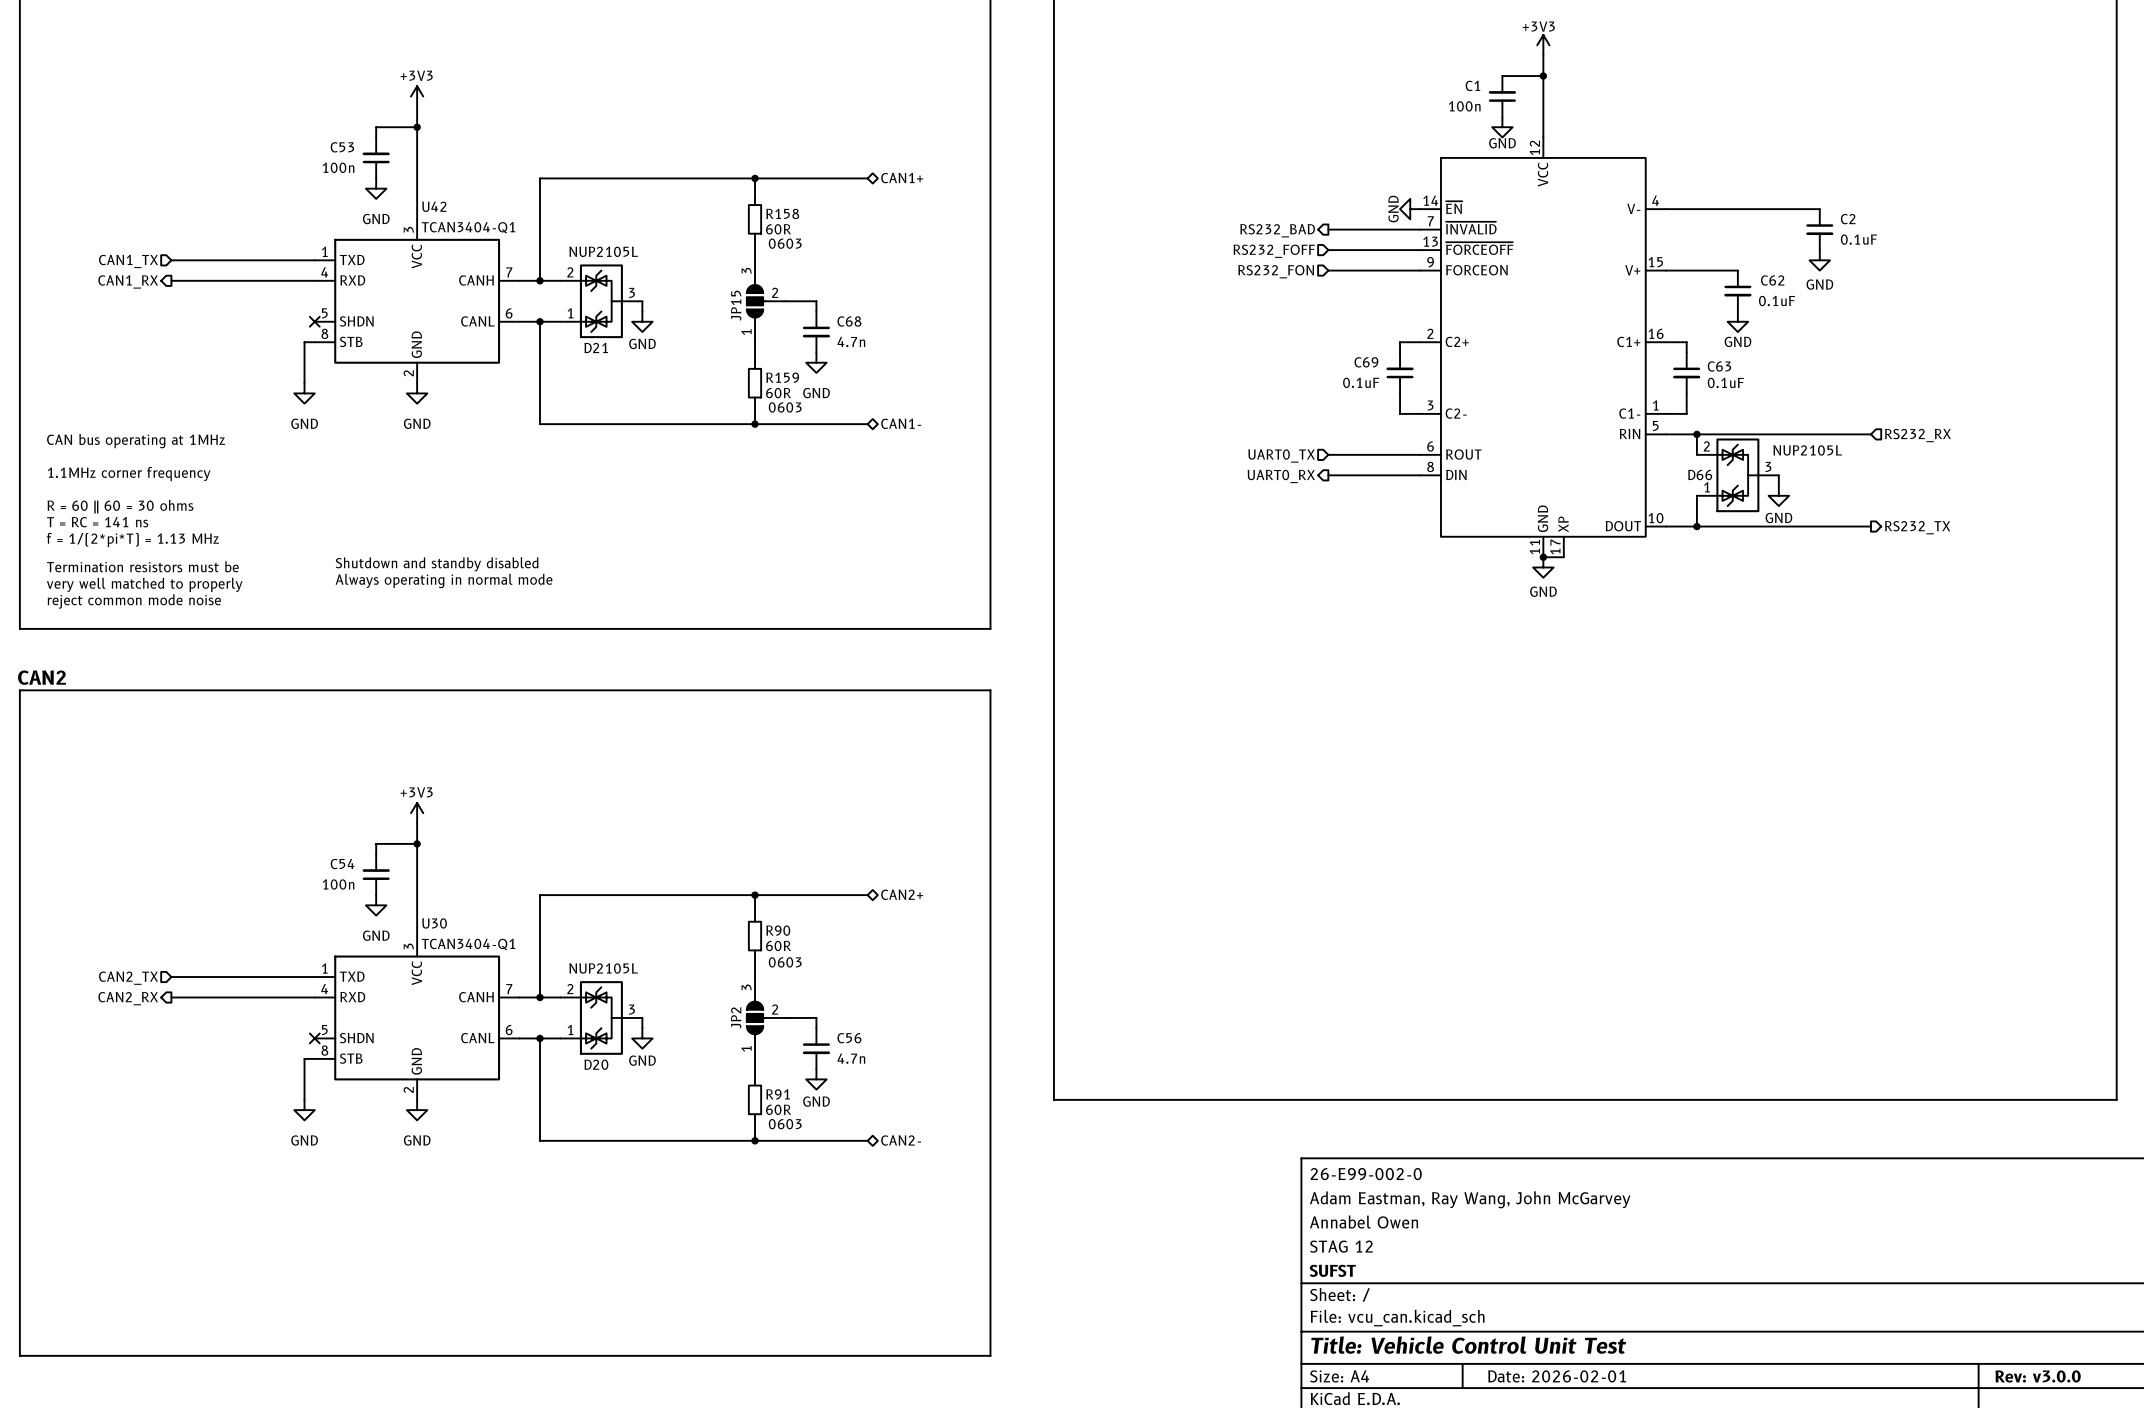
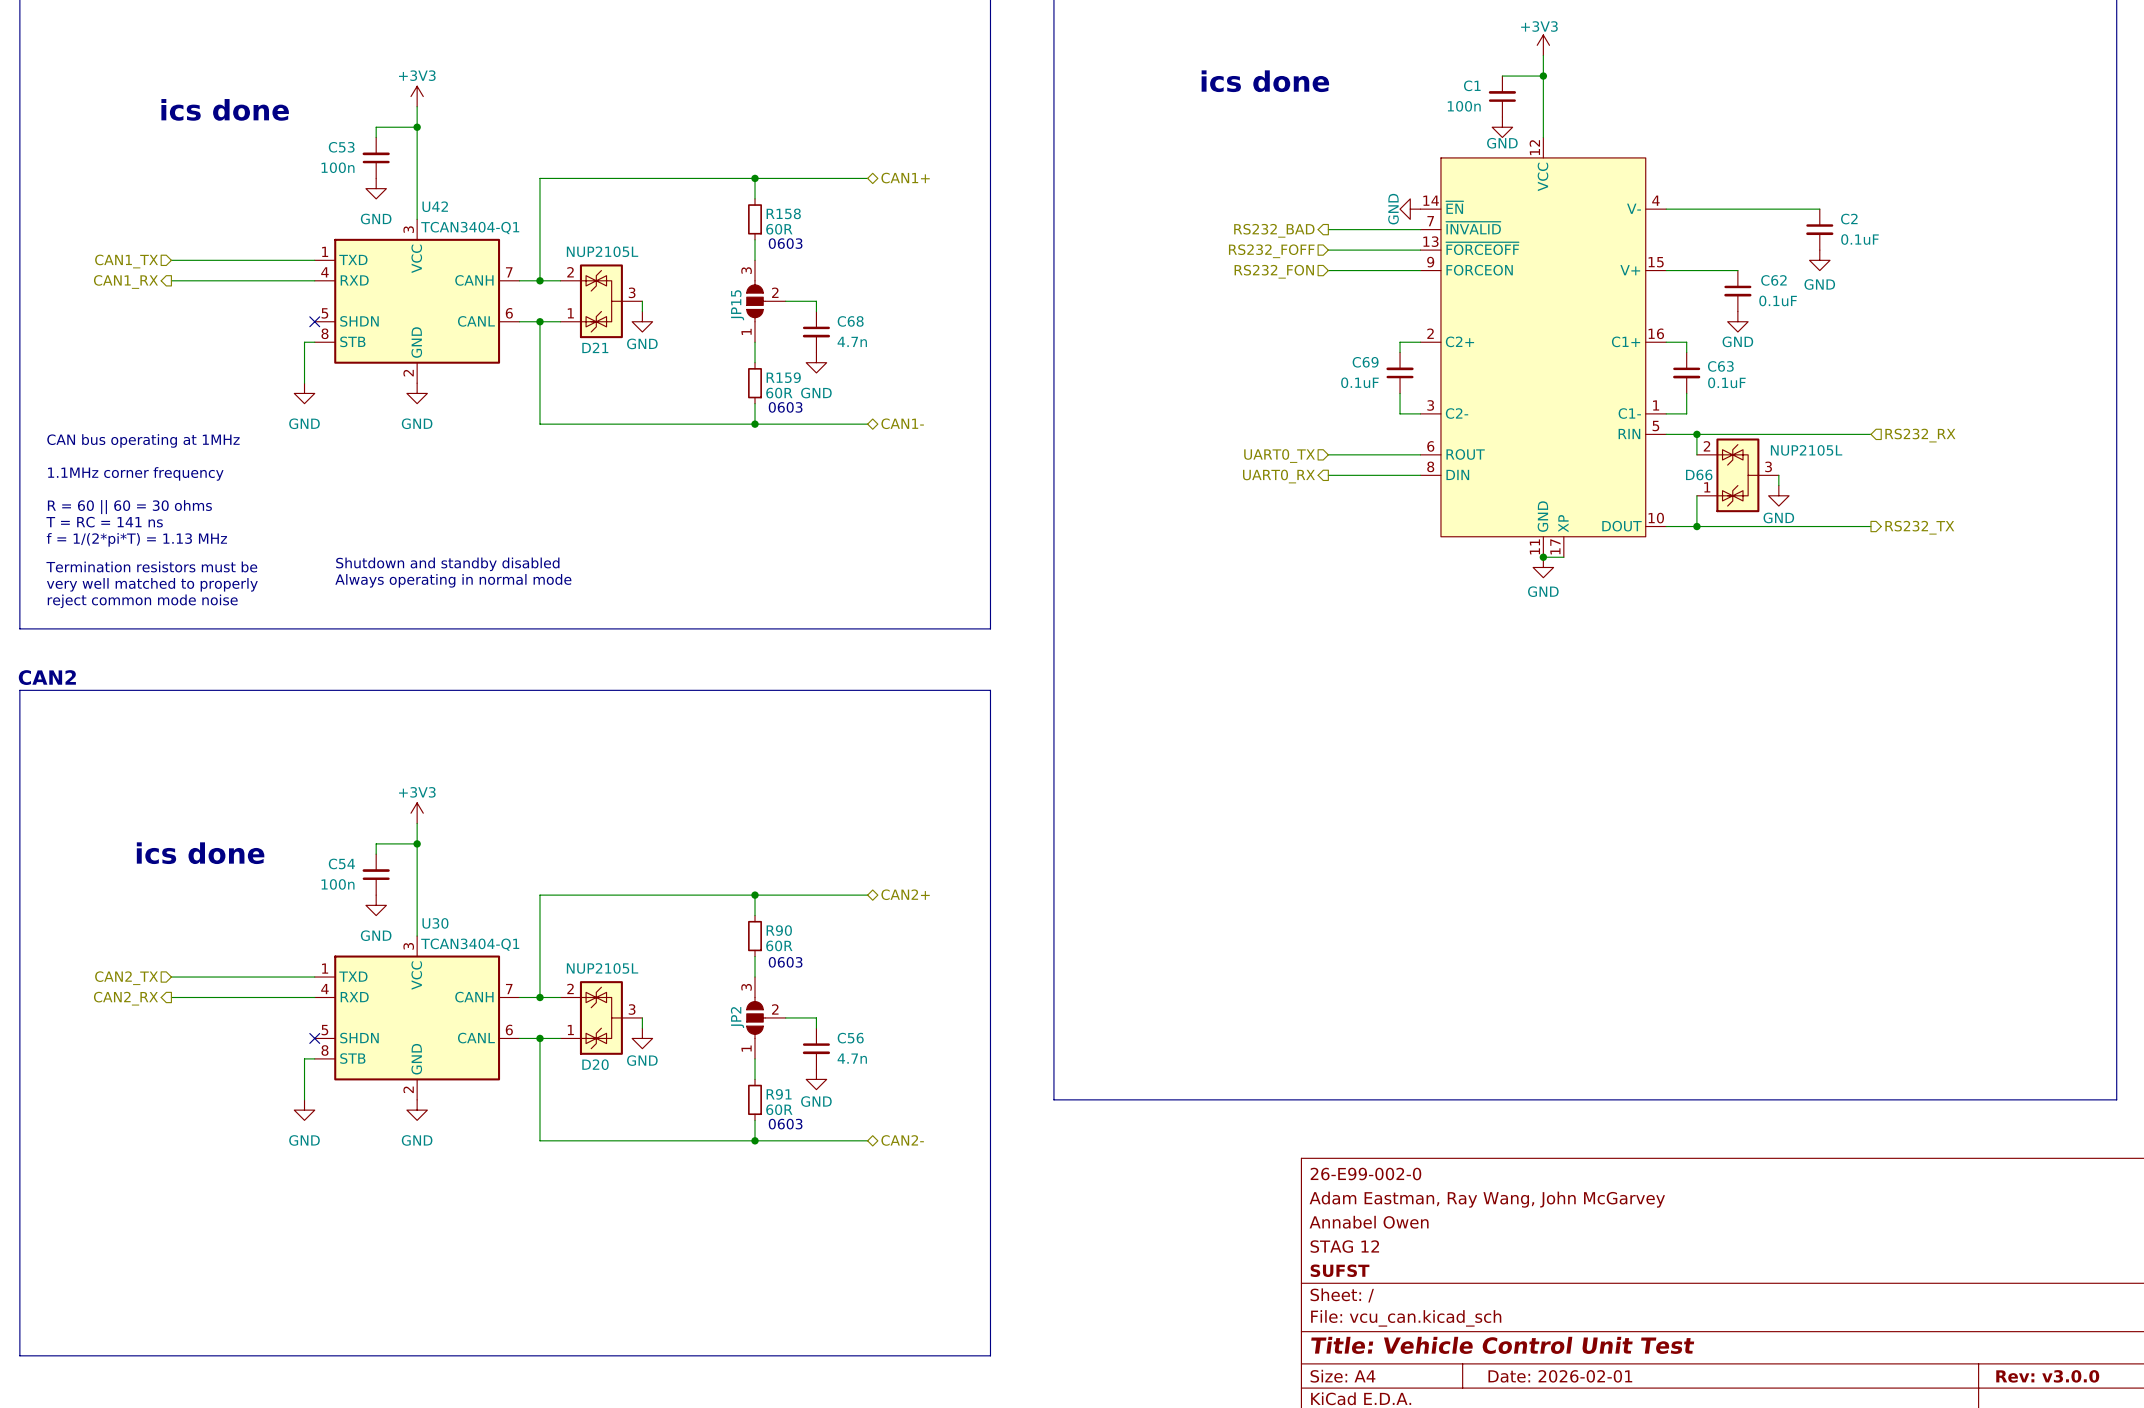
text: none -> ics done (1265, 81)
text: none -> ics done (225, 109)
text: none -> ics done (200, 853)

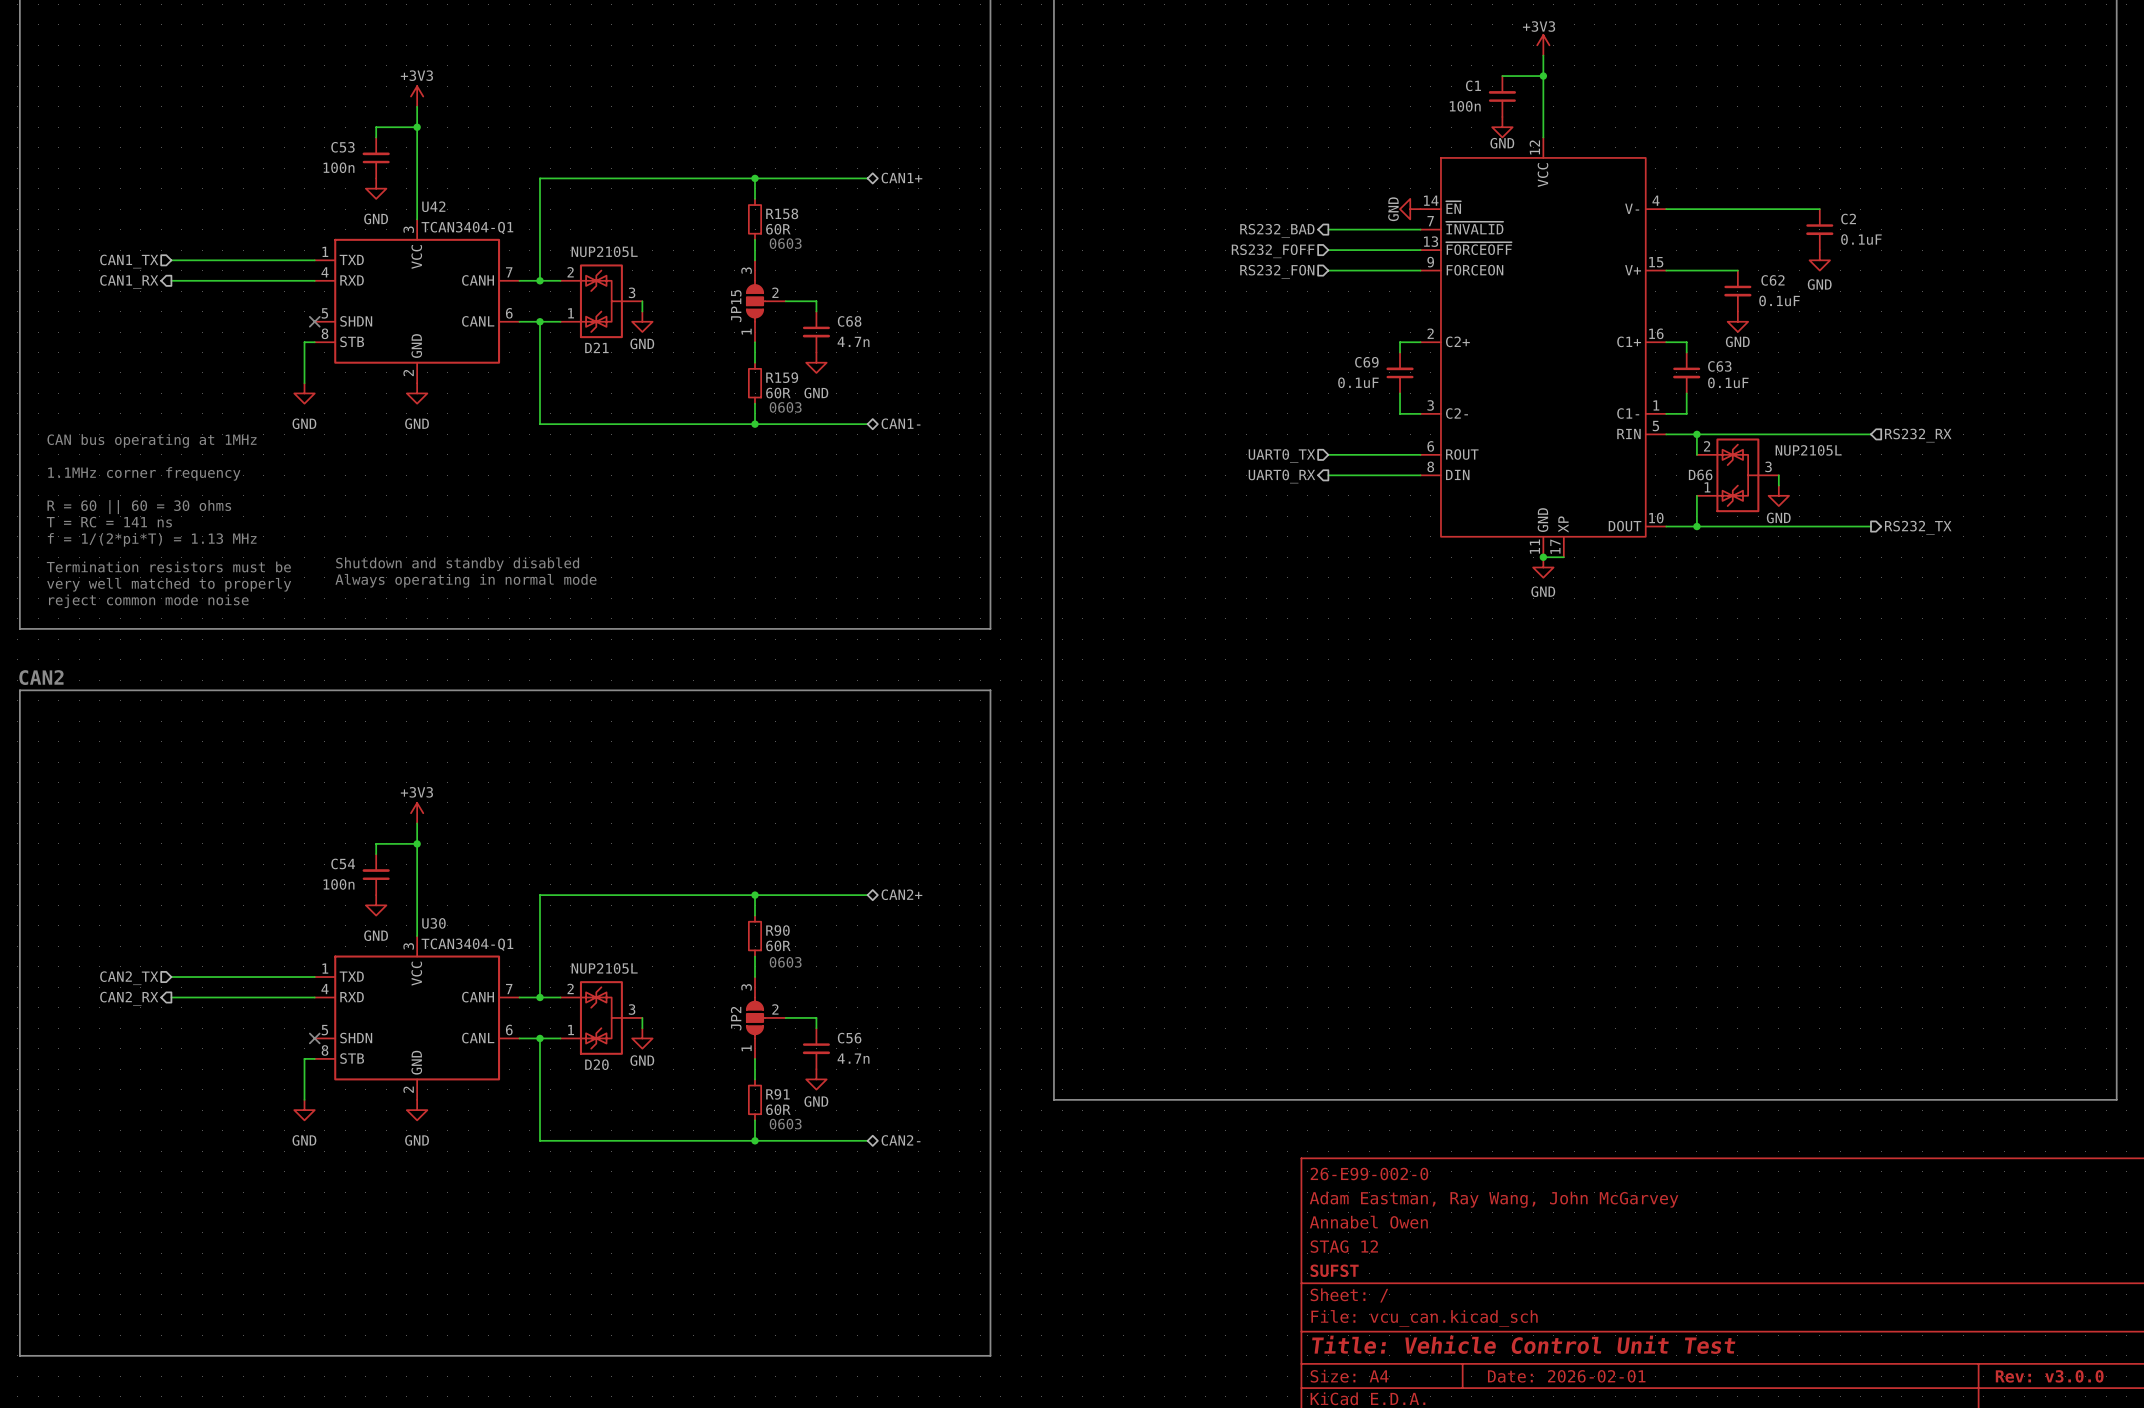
text: ics done (1265, 81) -> none
text: ics done (225, 109) -> none
text: ics done (200, 853) -> none

